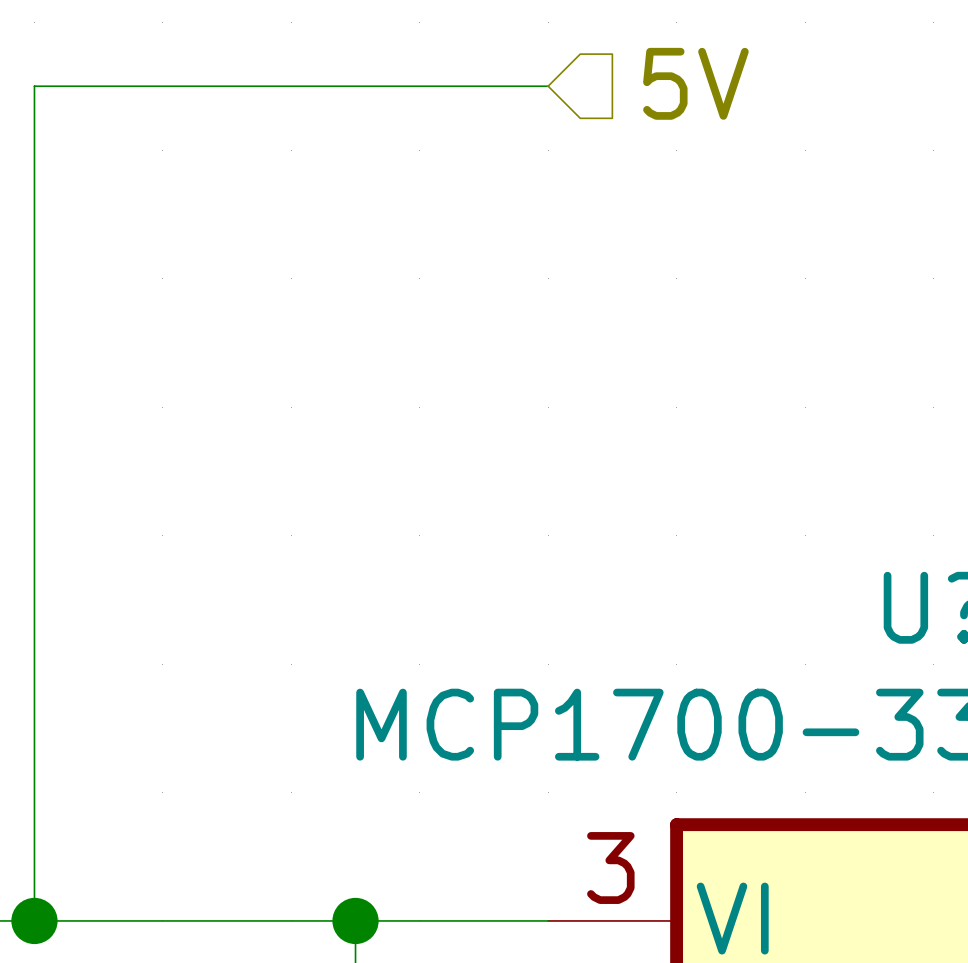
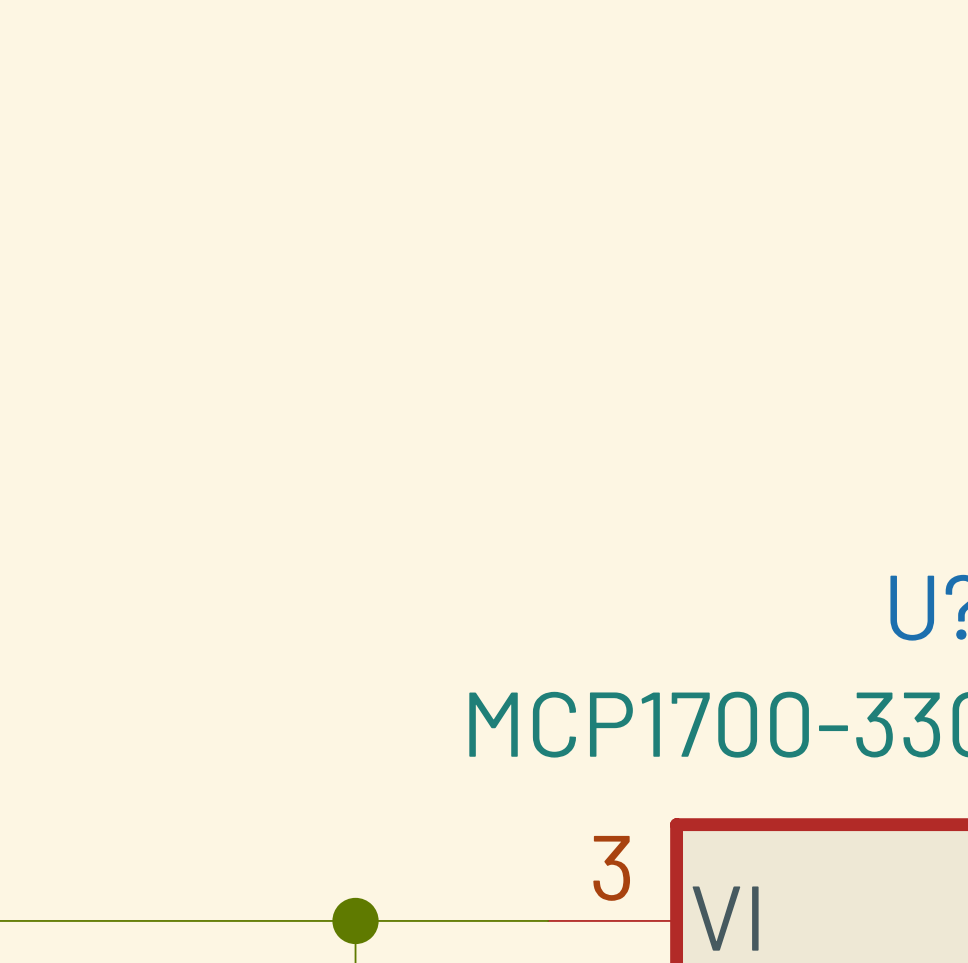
hierarchical label: 5V (695, 83) -> none
wire: (548, 86) (34, 86) (34, 920) -> none
junction: (34, 920) -> none

